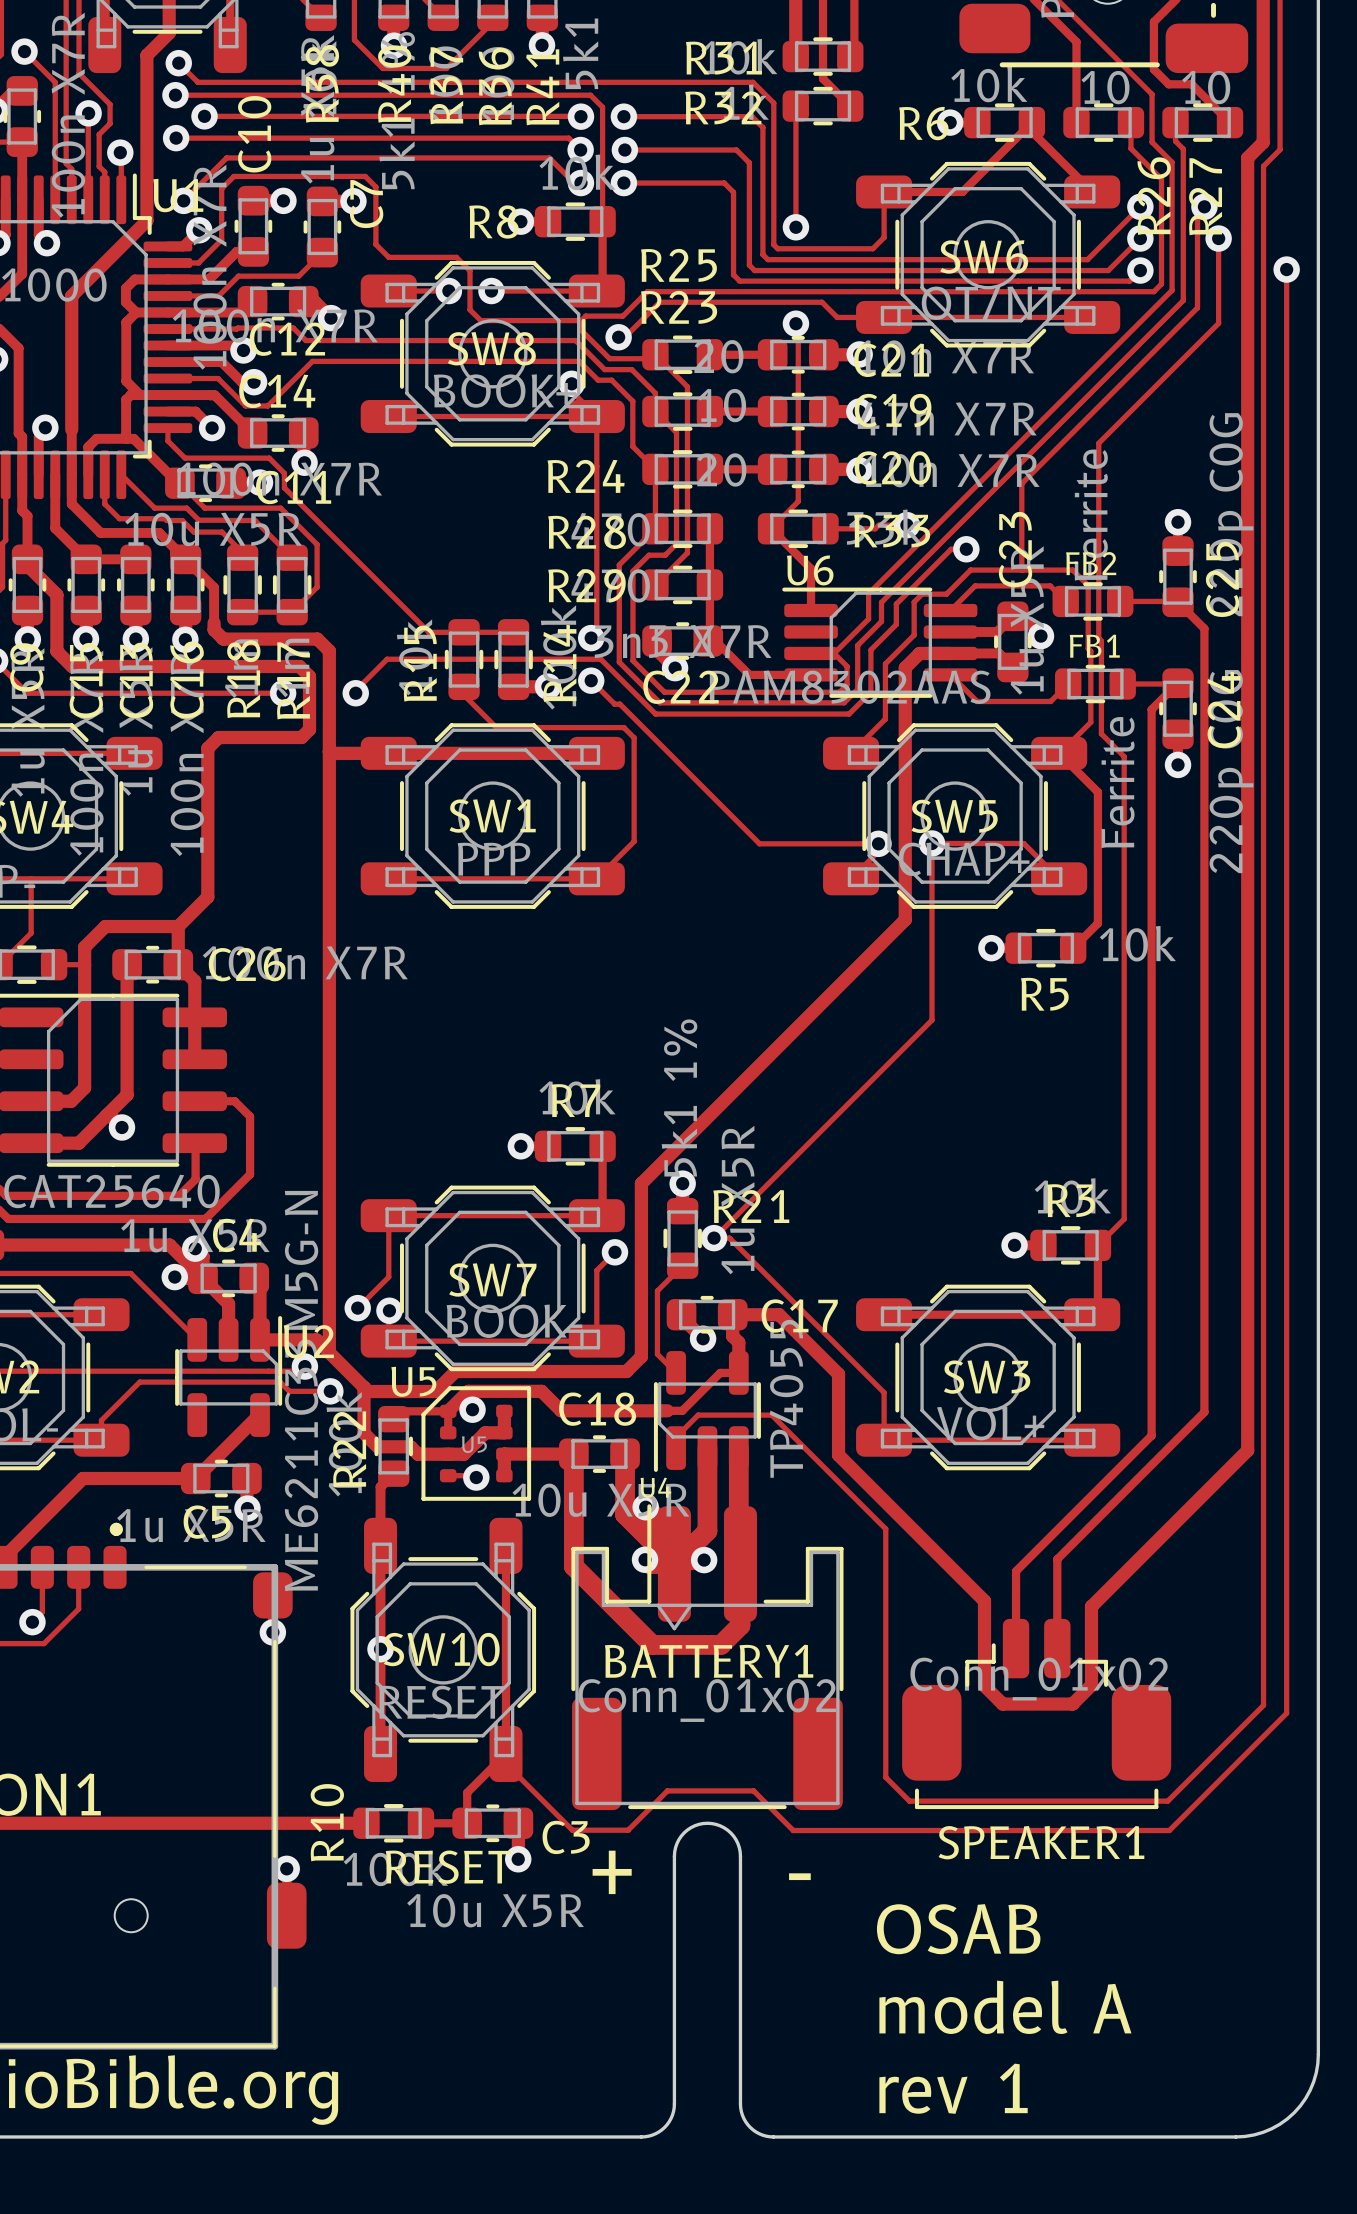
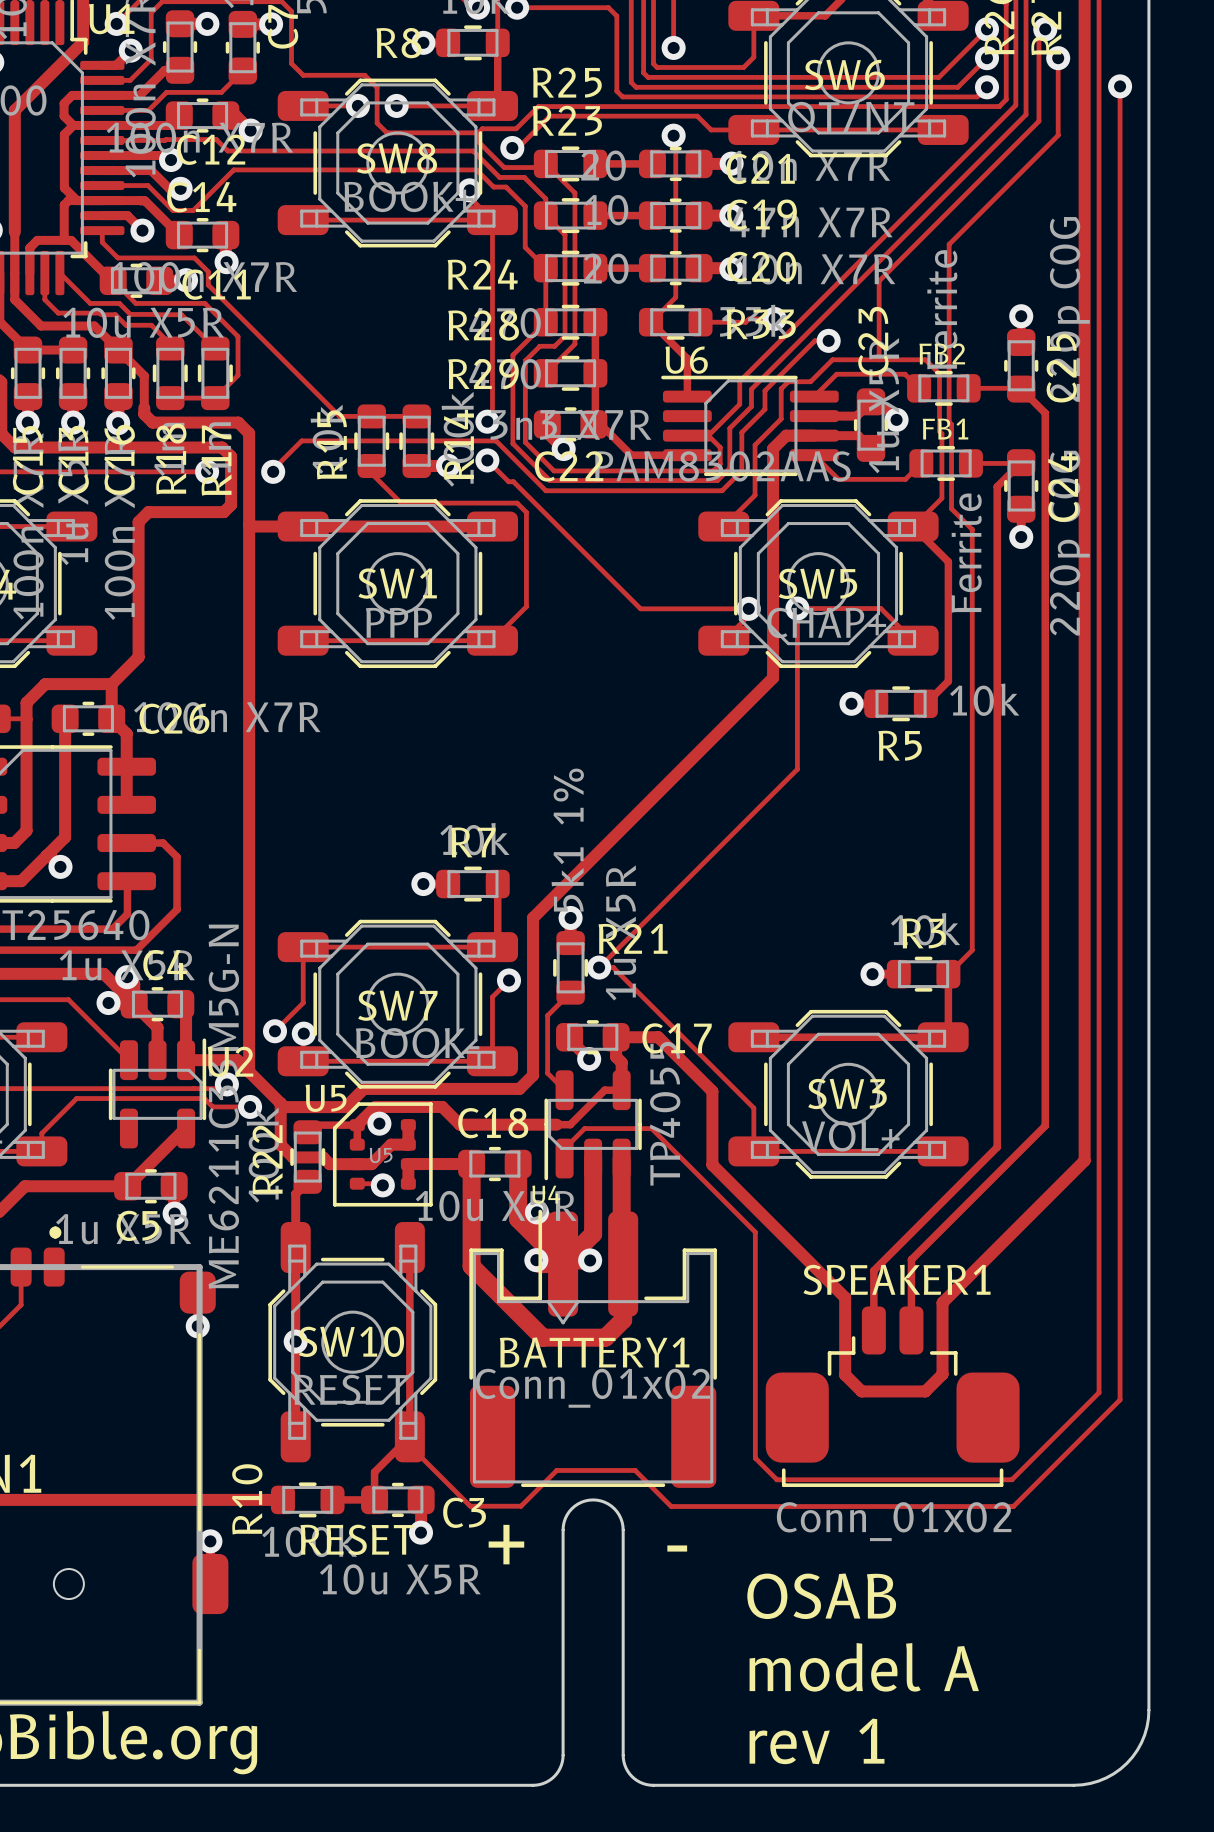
SPEAKER1 footprint: [902, 1618, 1172, 1810] -> [765, 1306, 1020, 1487]
SPEAKER1 value position: Conn_01x02 (1039, 1679) -> Conn_01x02 (894, 1521)
SPEAKER1 name position: SPEAKER1 (1041, 1842) -> SPEAKER1 (897, 1279)

